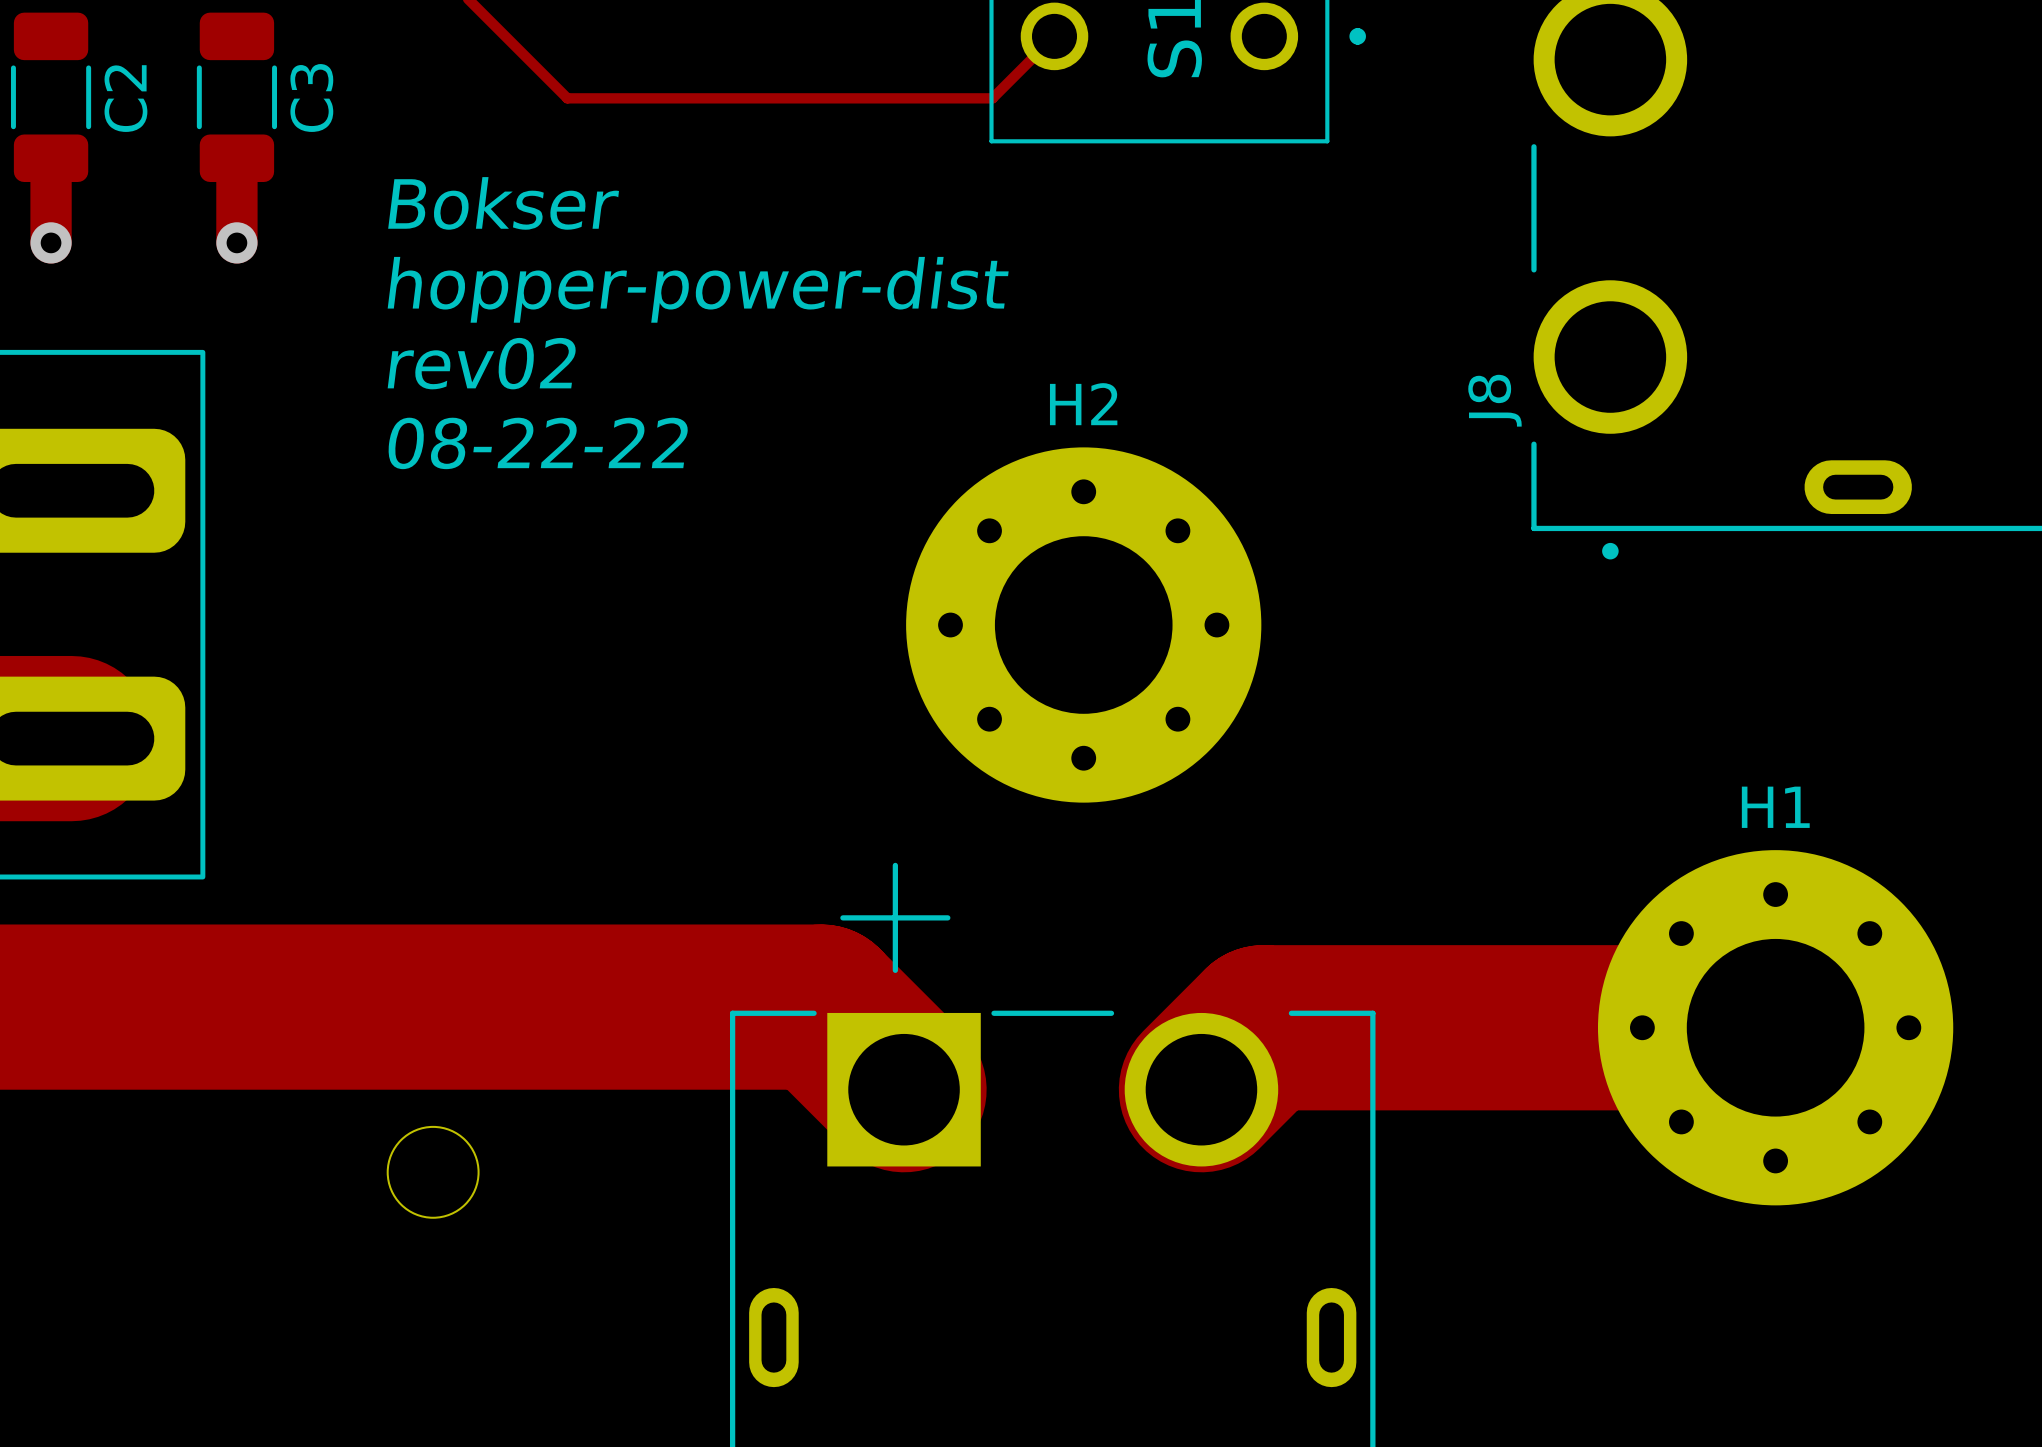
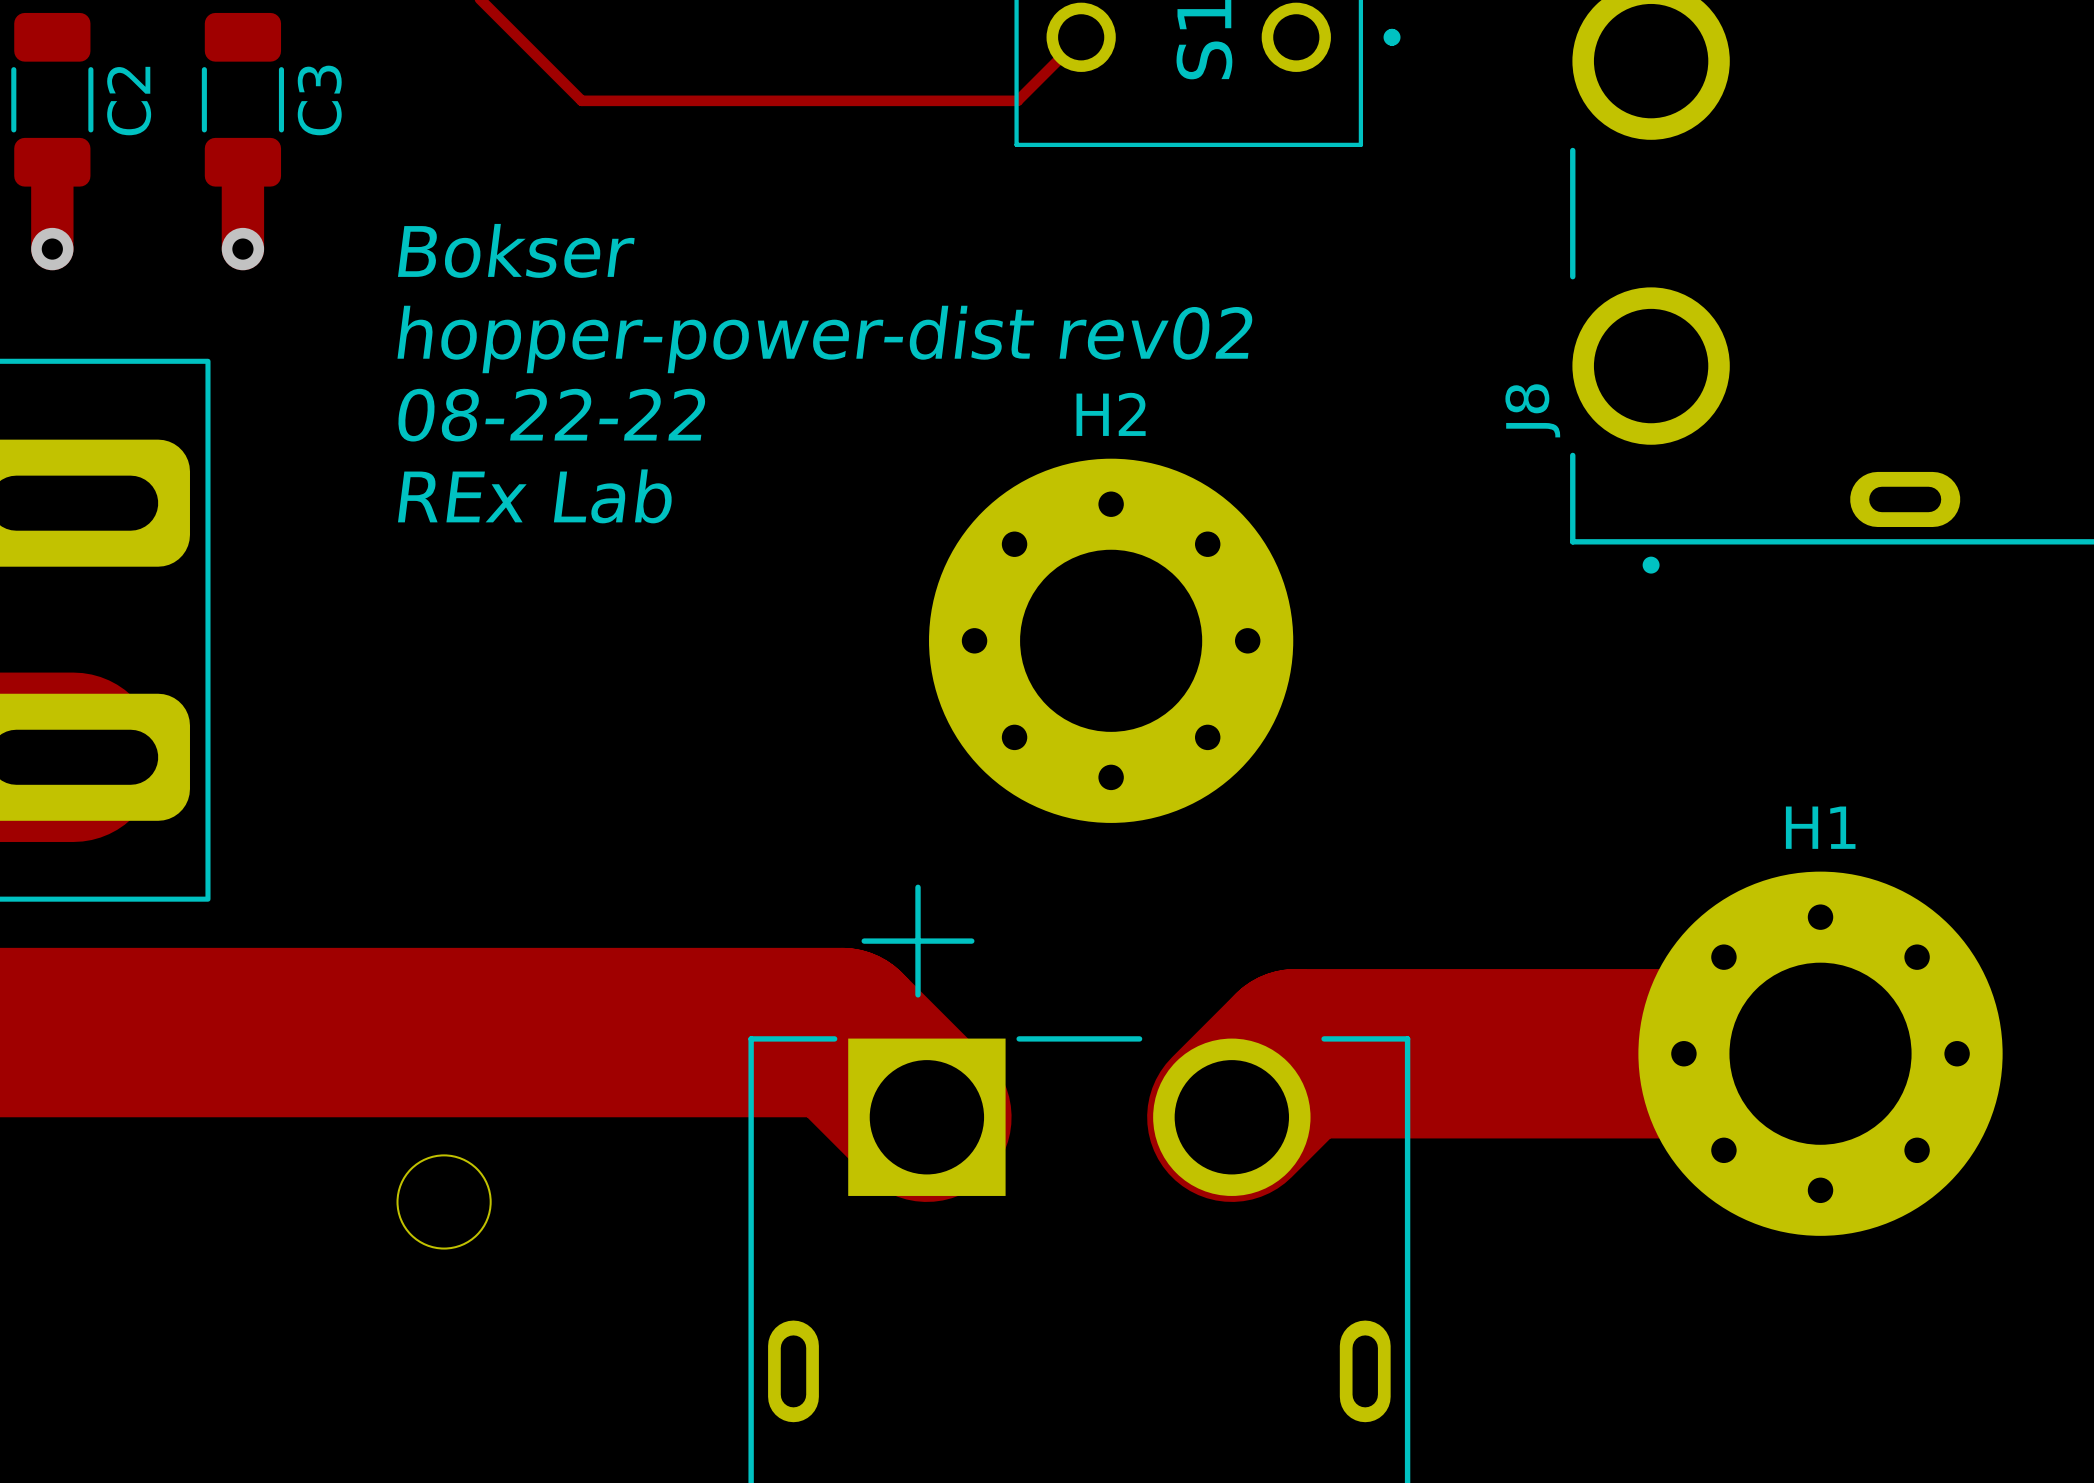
text position: Bokser (503, 203) -> Bokser (516, 250)
text: hopper-power-dist (698, 289) -> hopper-power-dist rev02 (825, 339)
text: rev02 (481, 363) -> none
text position: 08-22-22 (537, 443) -> 08-22-22 (551, 415)
text: none -> REx Lab (535, 496)

